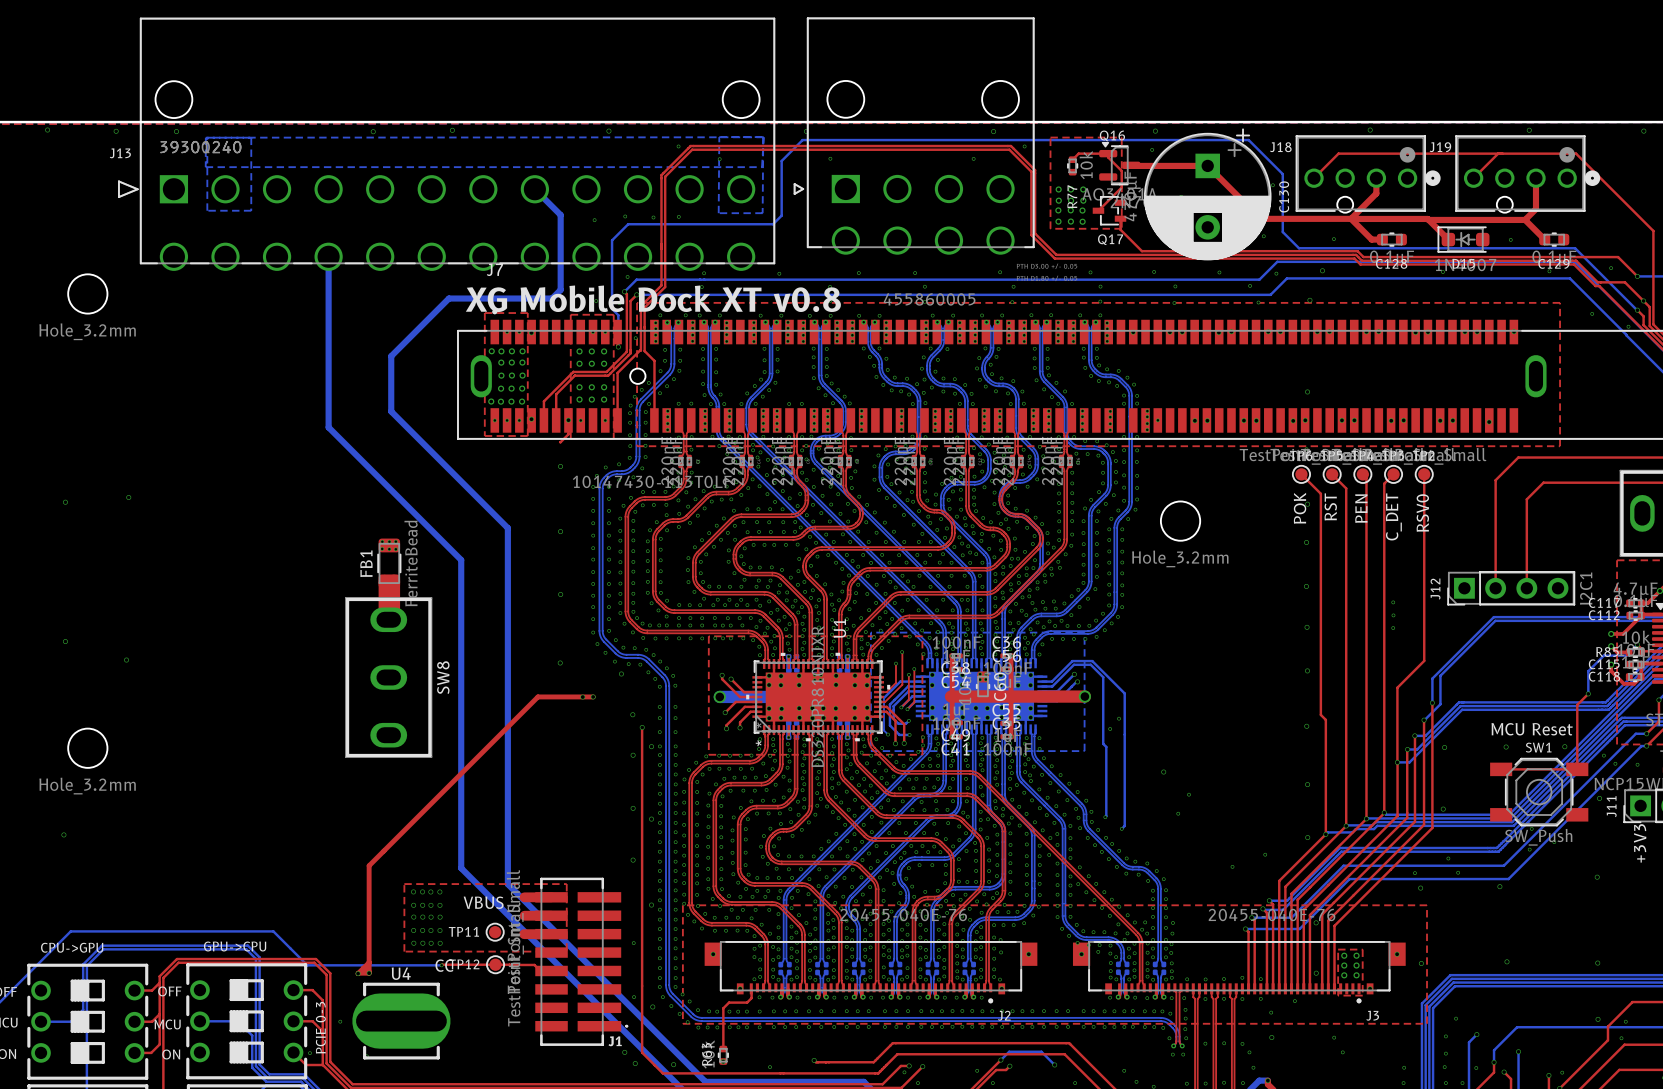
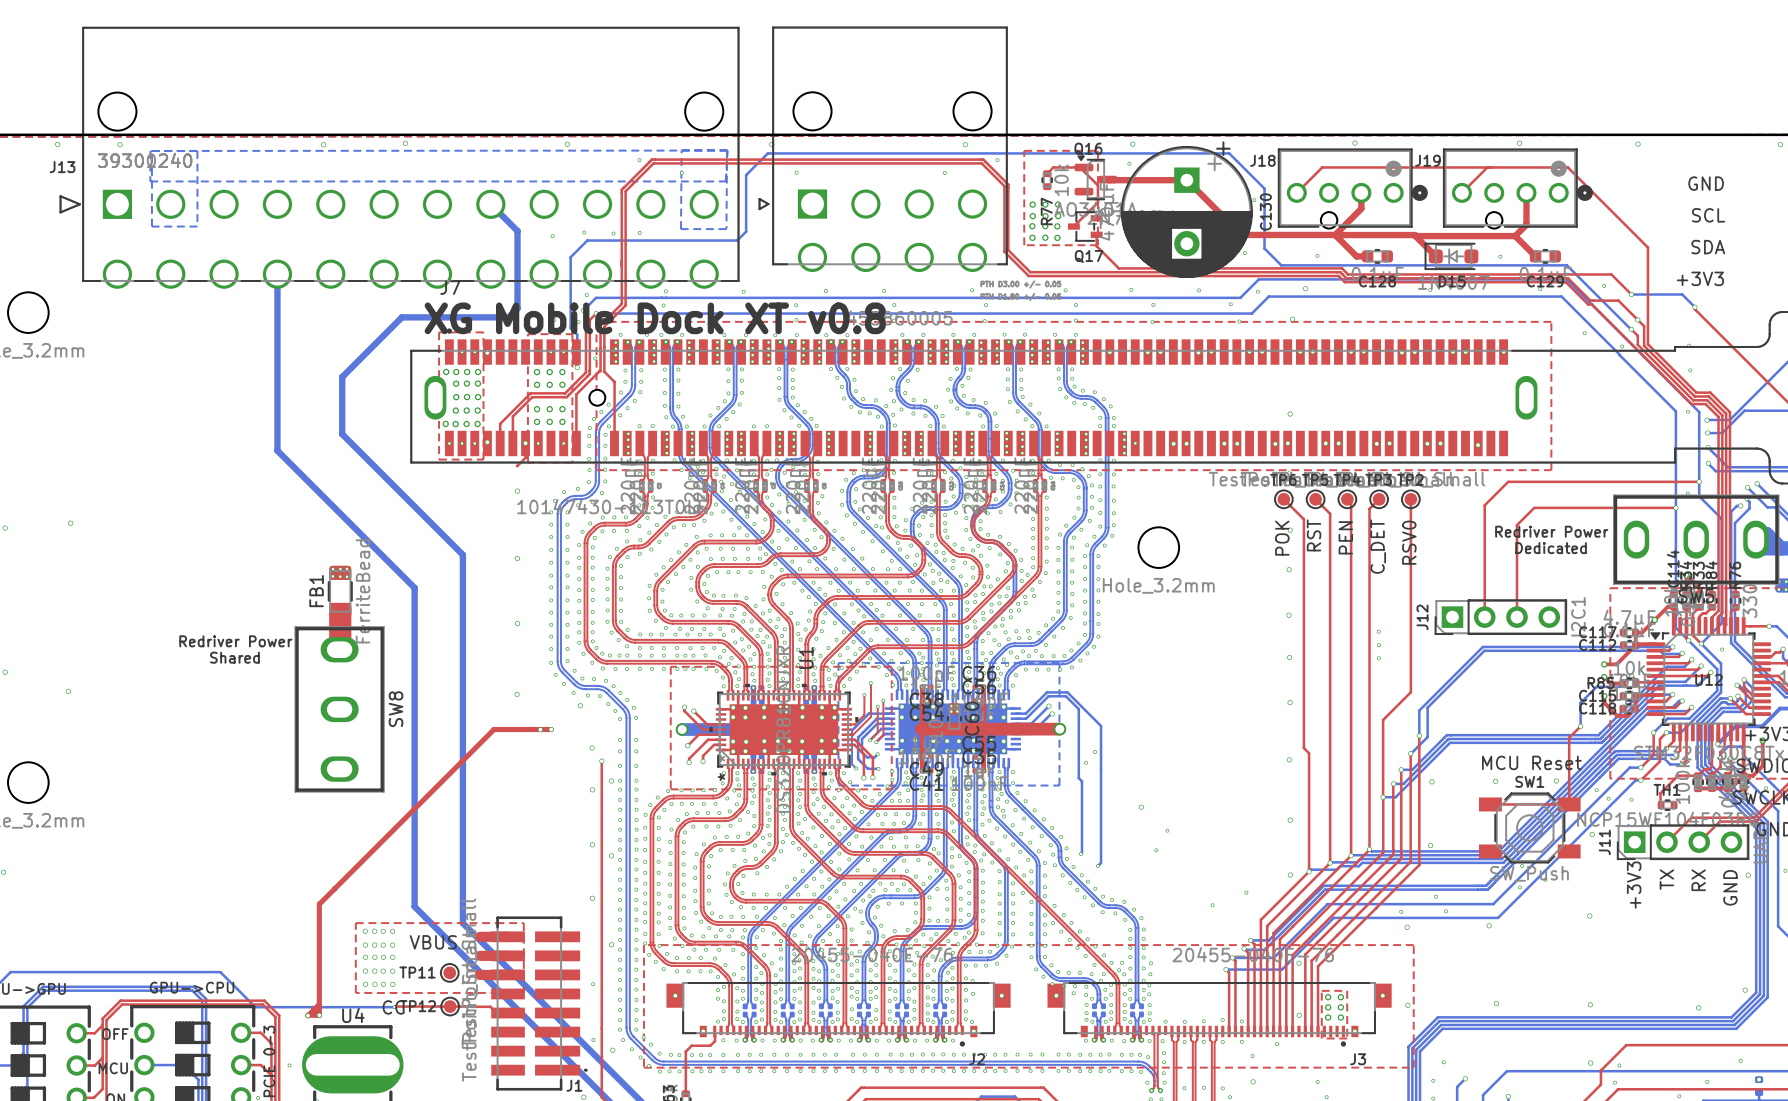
text: none -> Redriver Power (1551, 531)
text: none -> Dedicated (1551, 548)
text: none -> Redriver Power (235, 641)
text: none -> Shared (234, 657)

